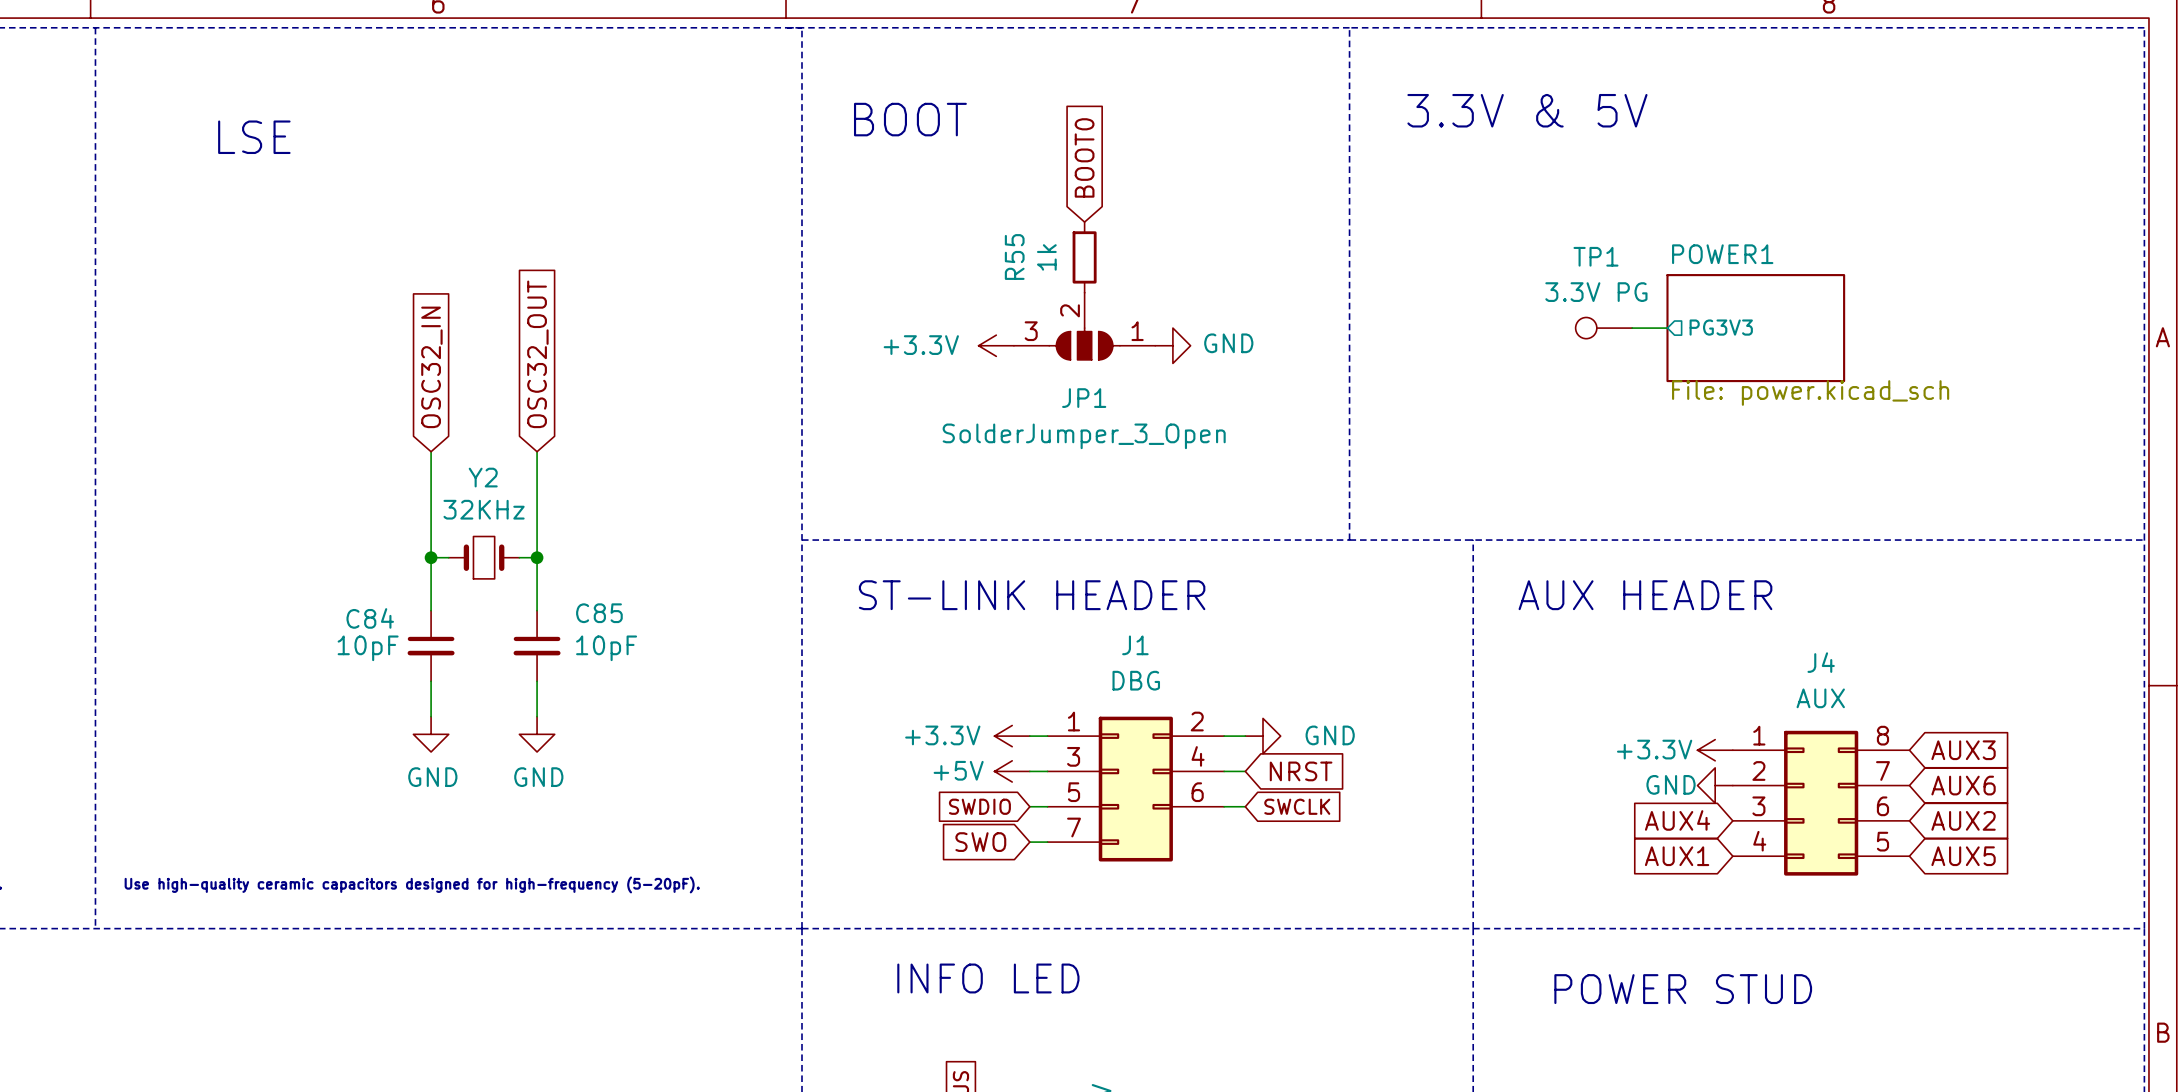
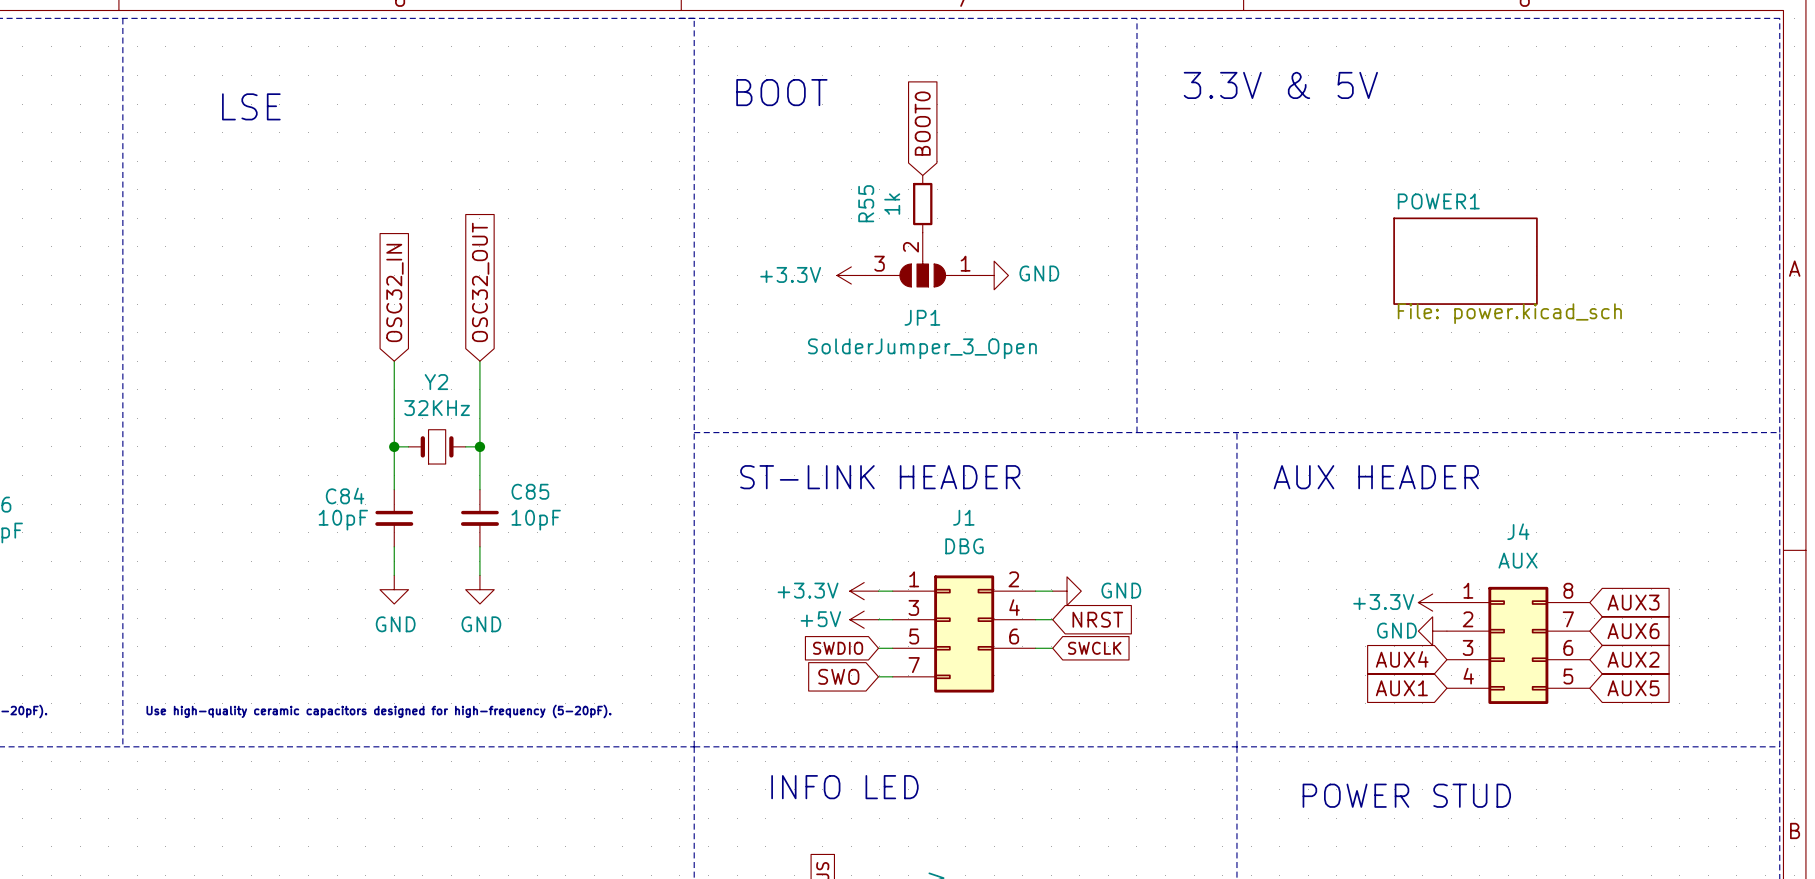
sheet pin: PG3V3 (1721, 327) -> none
TP1: 3.3V PG (1603, 328) -> none
wire: (1632, 328) (1667, 328) -> none

